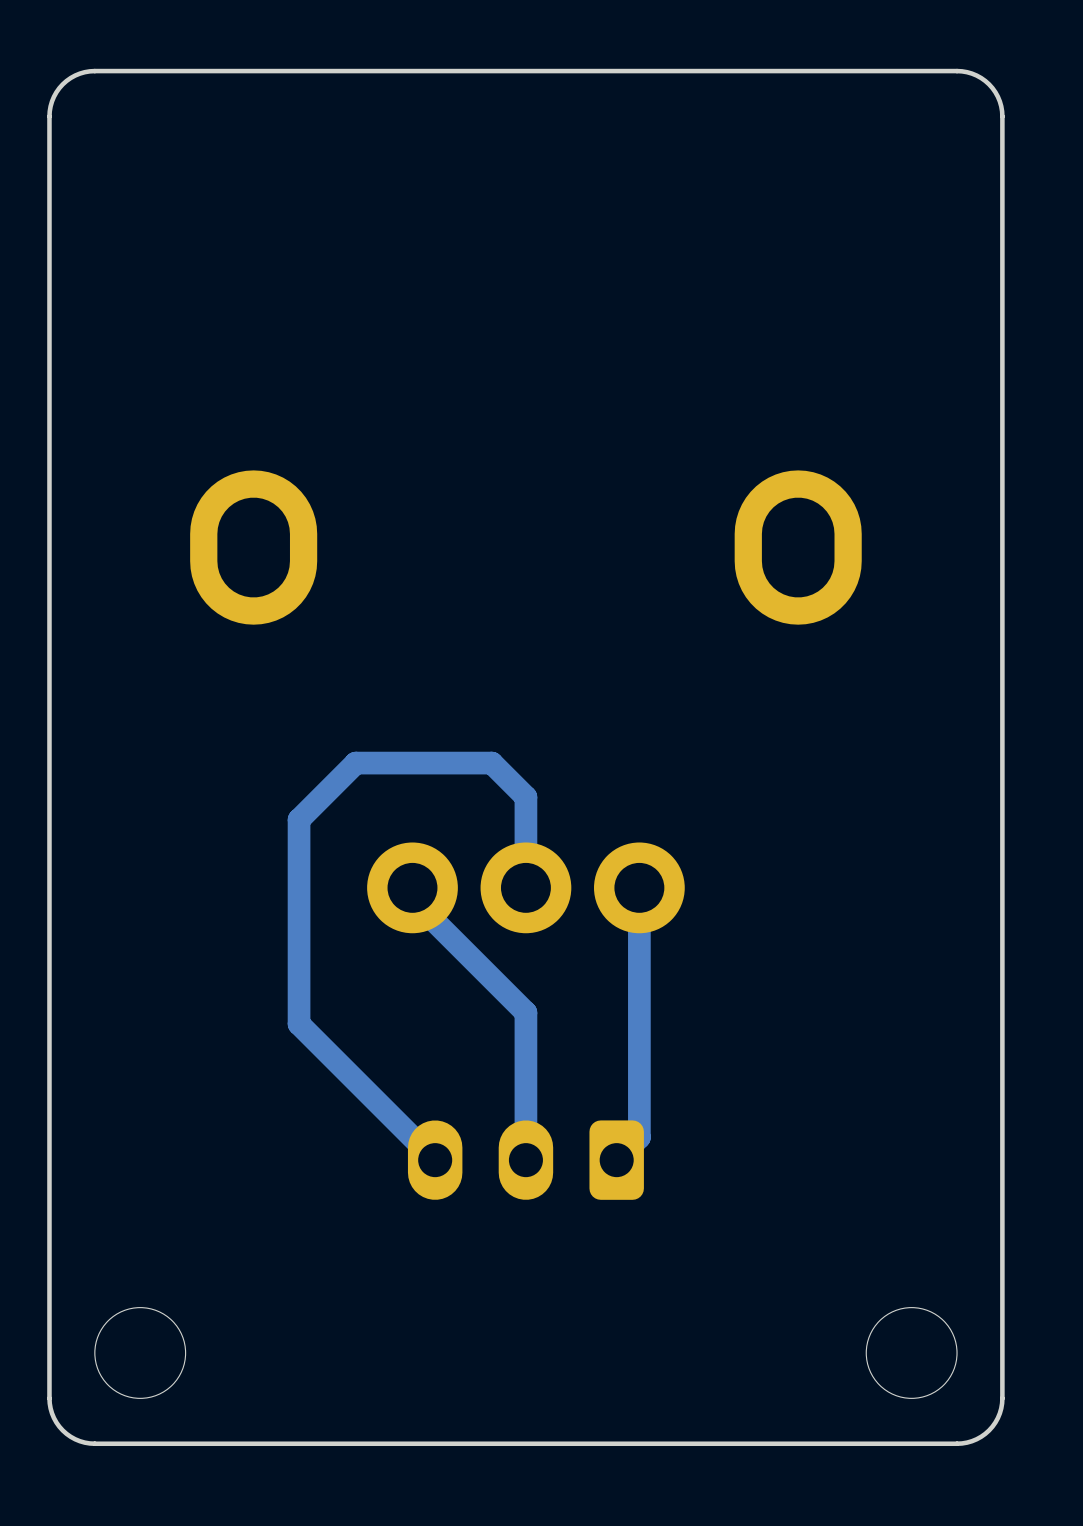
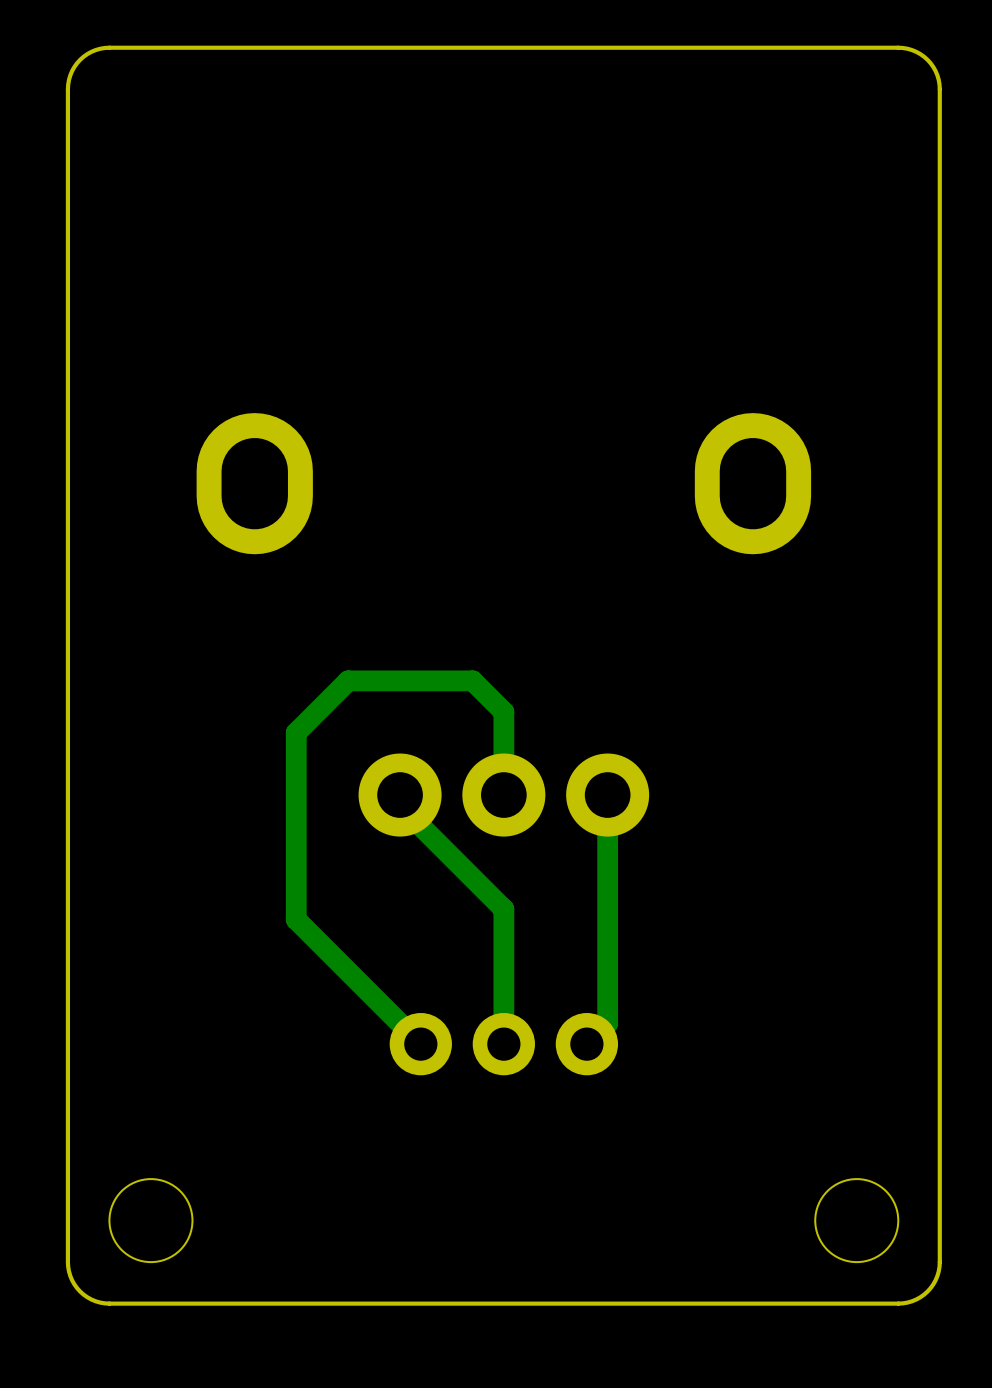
part footprint: [407, 1120, 644, 1200] -> [389, 1013, 619, 1076]

